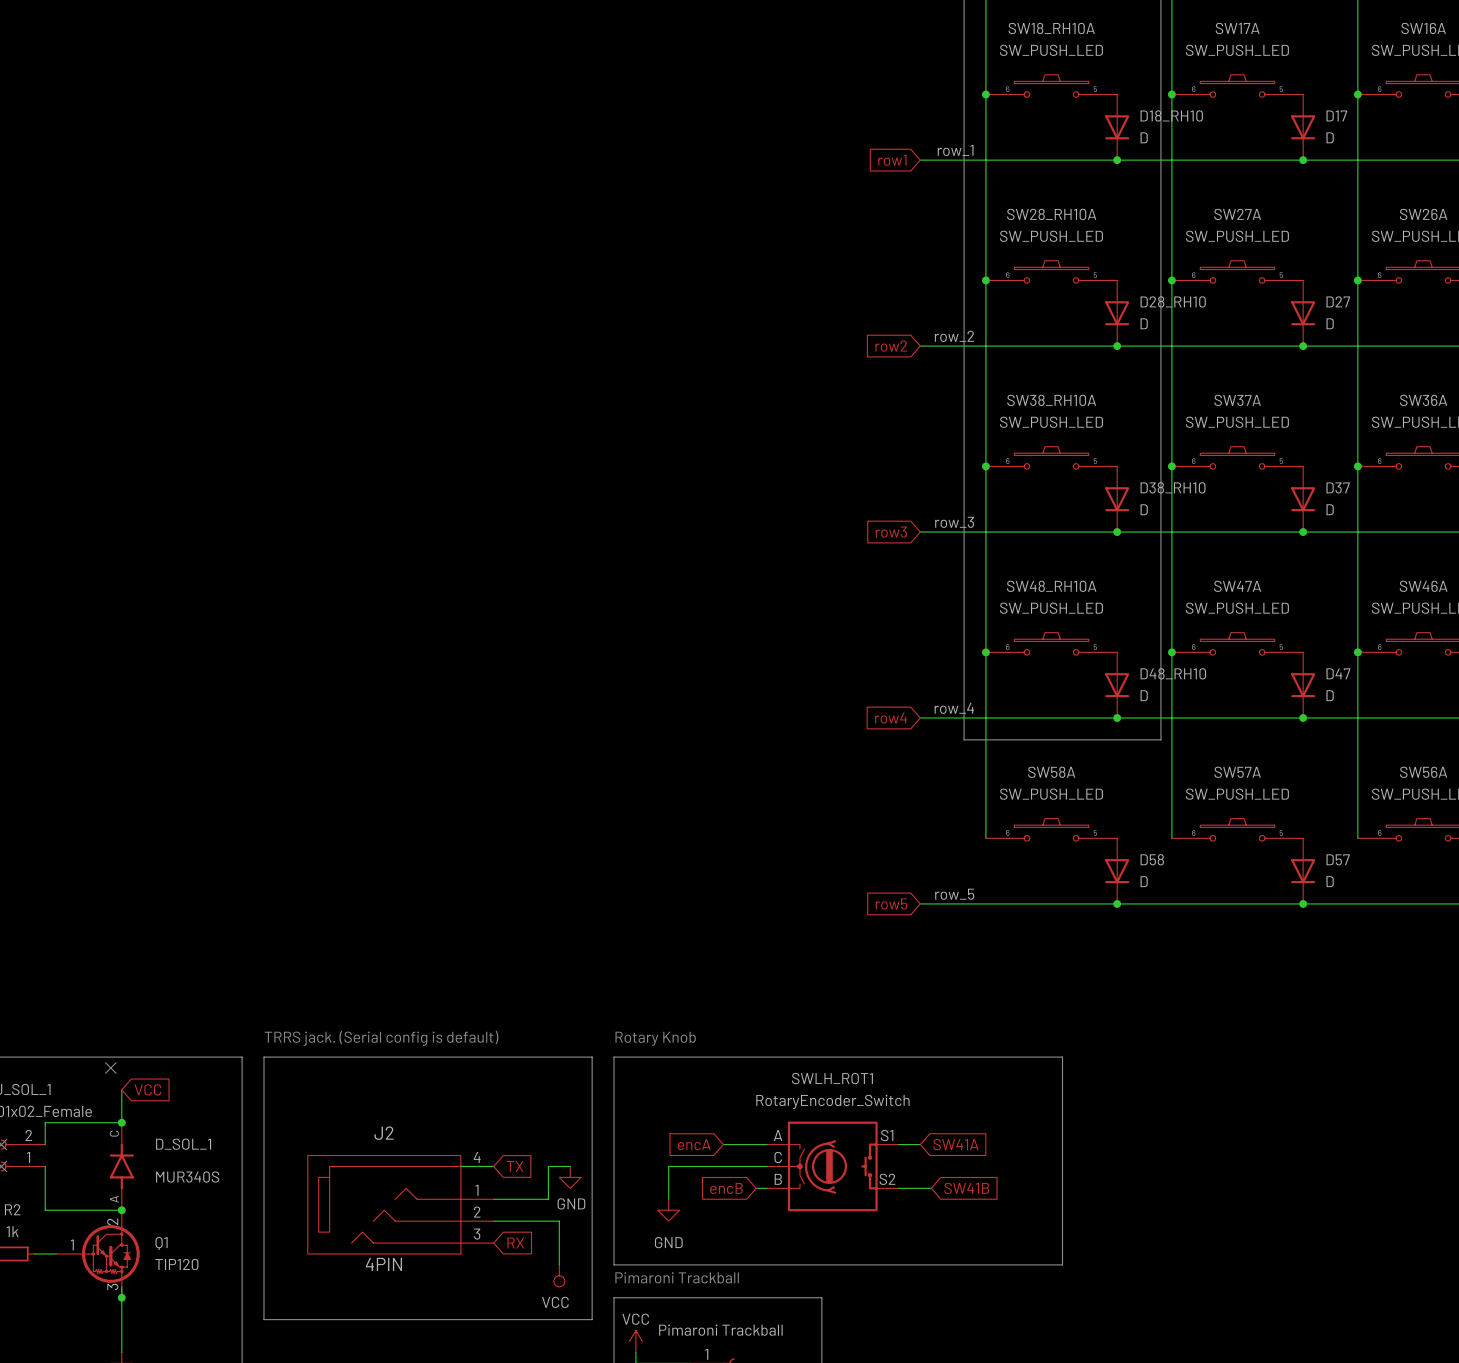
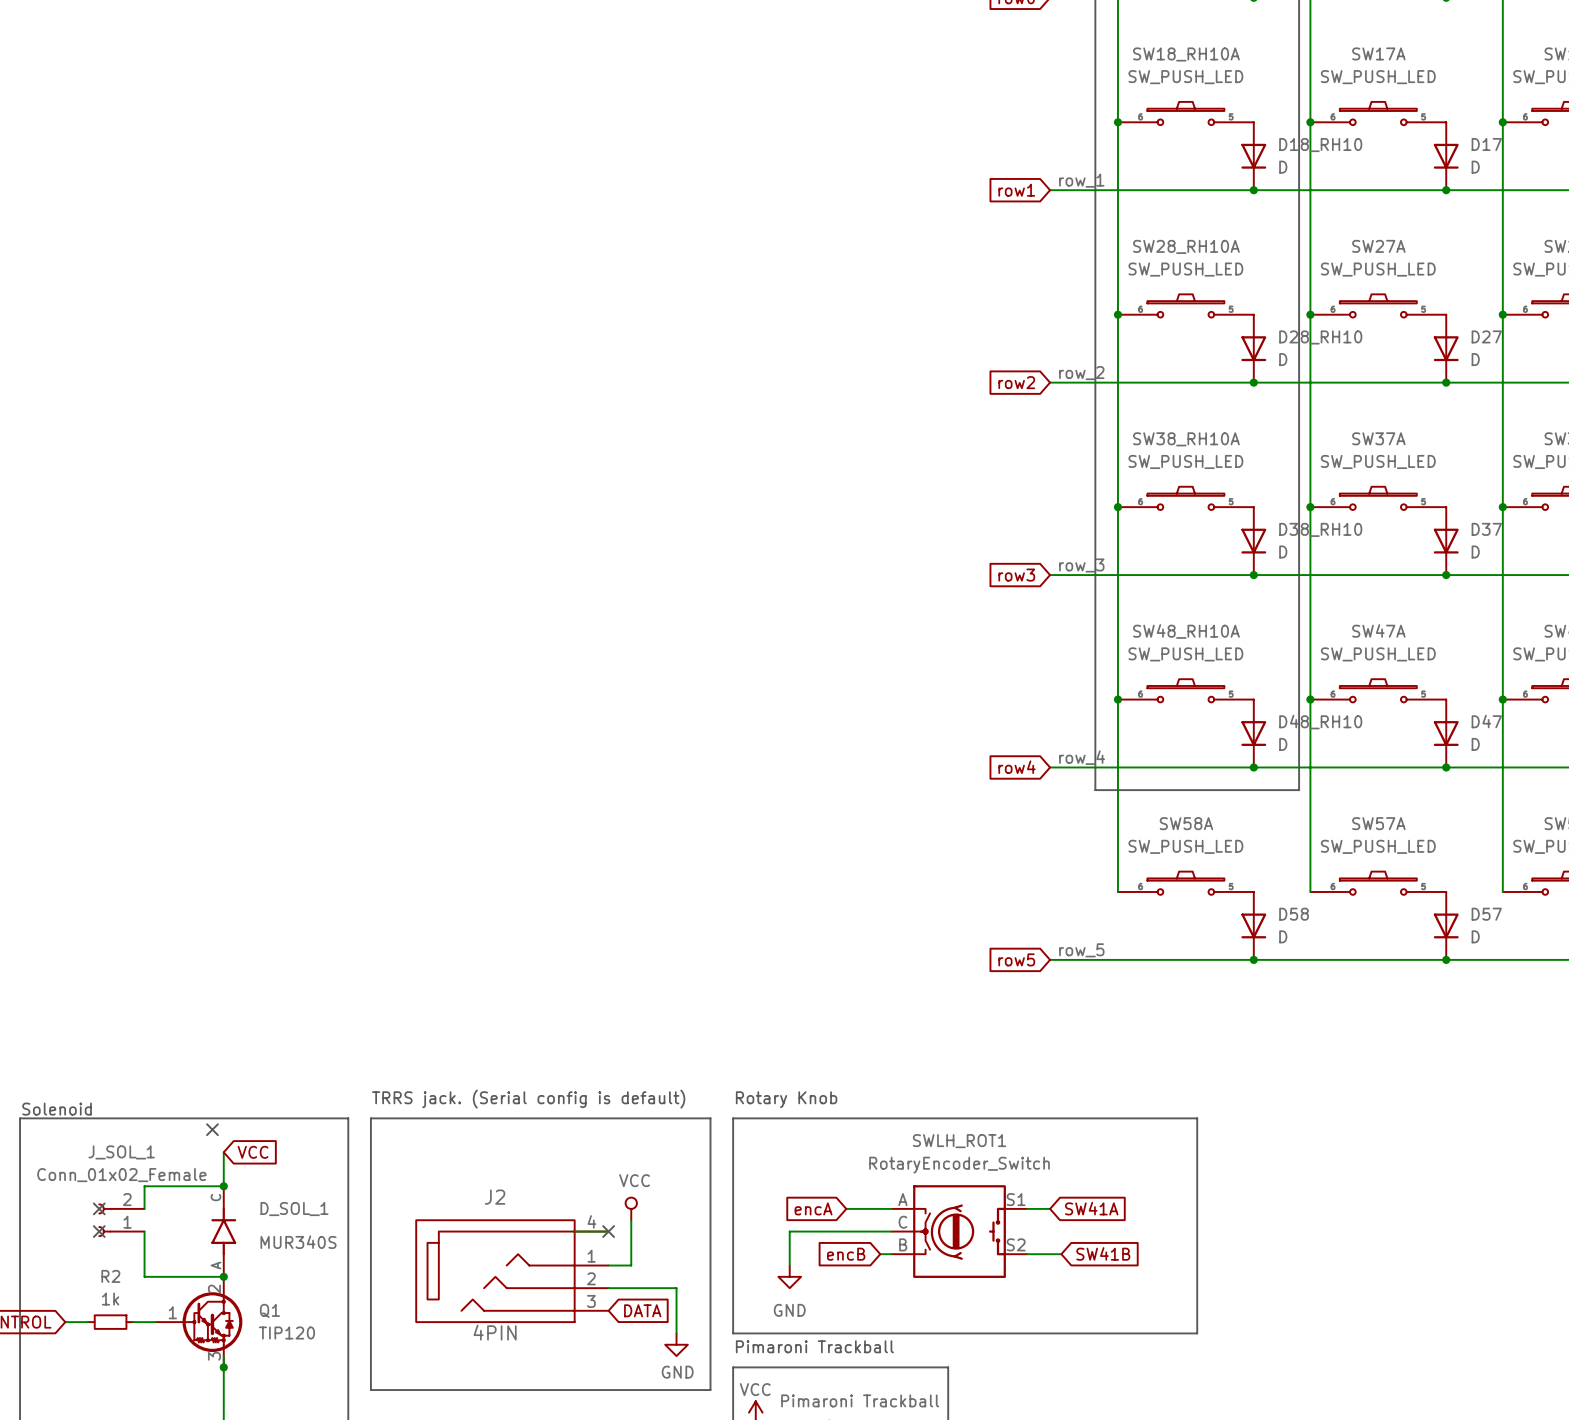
power symbol: none -> VCC (631, 1208)
no-connect mark: none -> (608, 1231)
global label: TX (515, 1166) -> none
wire: (570, 1166) (548, 1166) (548, 1199) (515, 1199) -> (631, 1220) (631, 1265)
power symbol: GND (570, 1177) -> none
global label: RX (515, 1243) -> DATA (642, 1310)
power symbol: VCC (559, 1275) -> GND (676, 1344)

